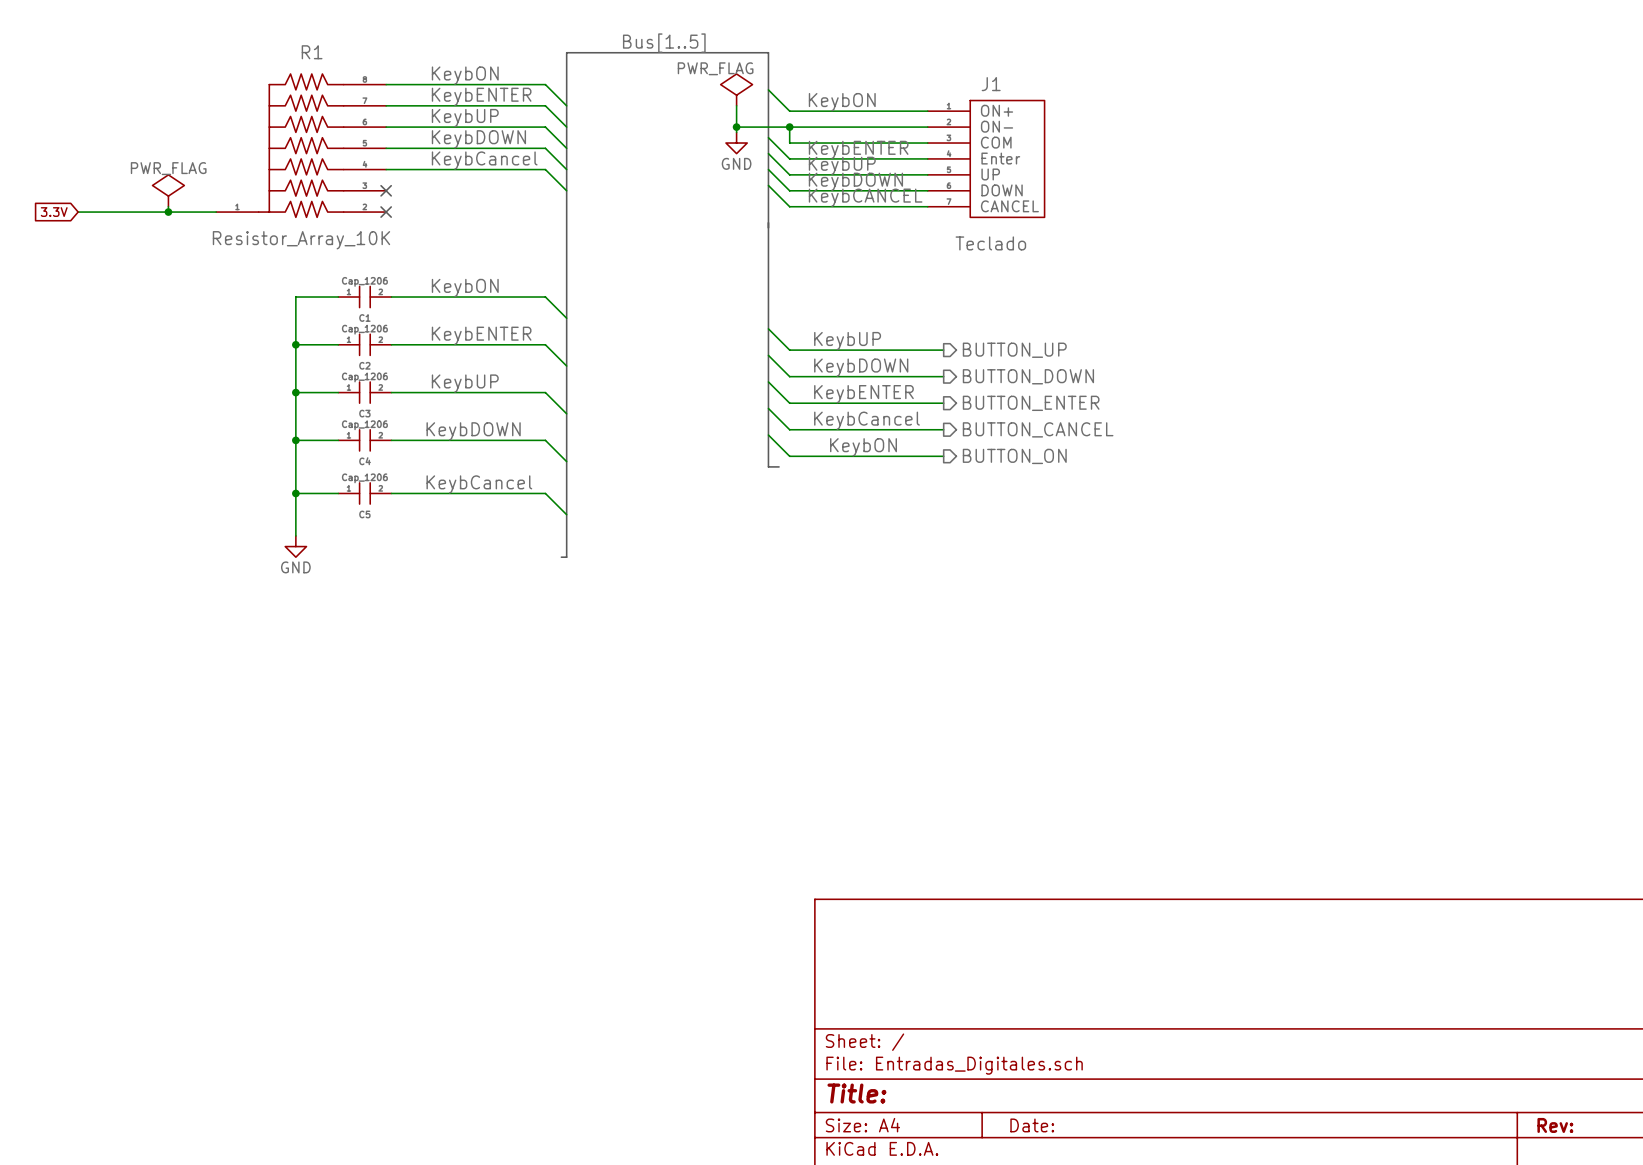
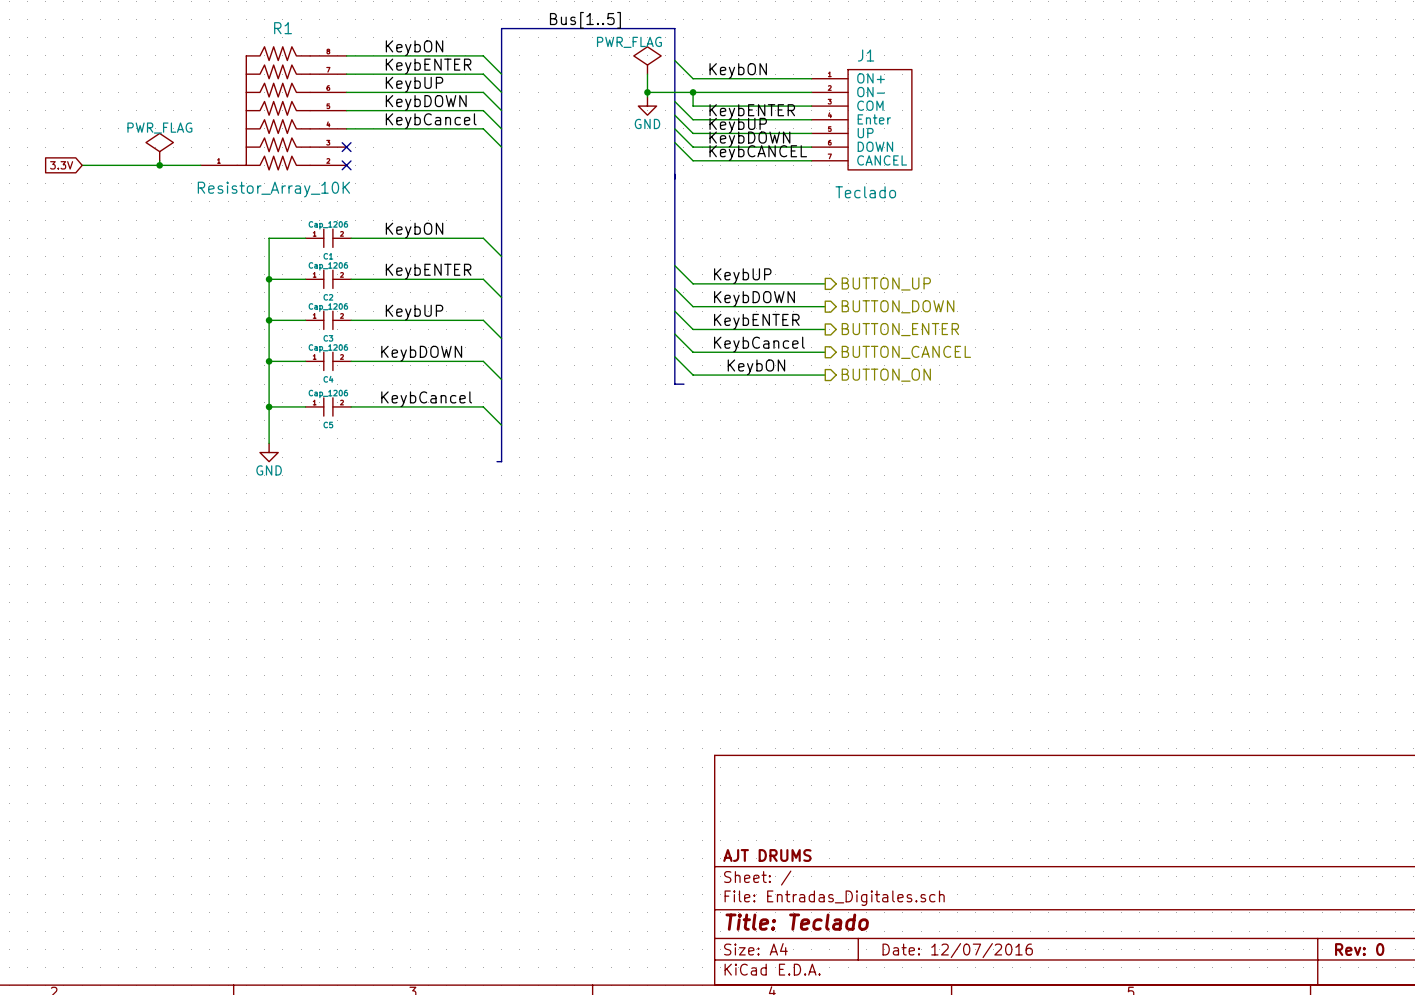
title block: none -> AJT DRUMS (767, 855)
title block: Title: (856, 1093) -> Title: Teclado (797, 922)
title block: Date: (1032, 1125) -> Date: 12/07/2016 (957, 950)
title block: Rev: (1555, 1125) -> Rev: 0 (1359, 949)

